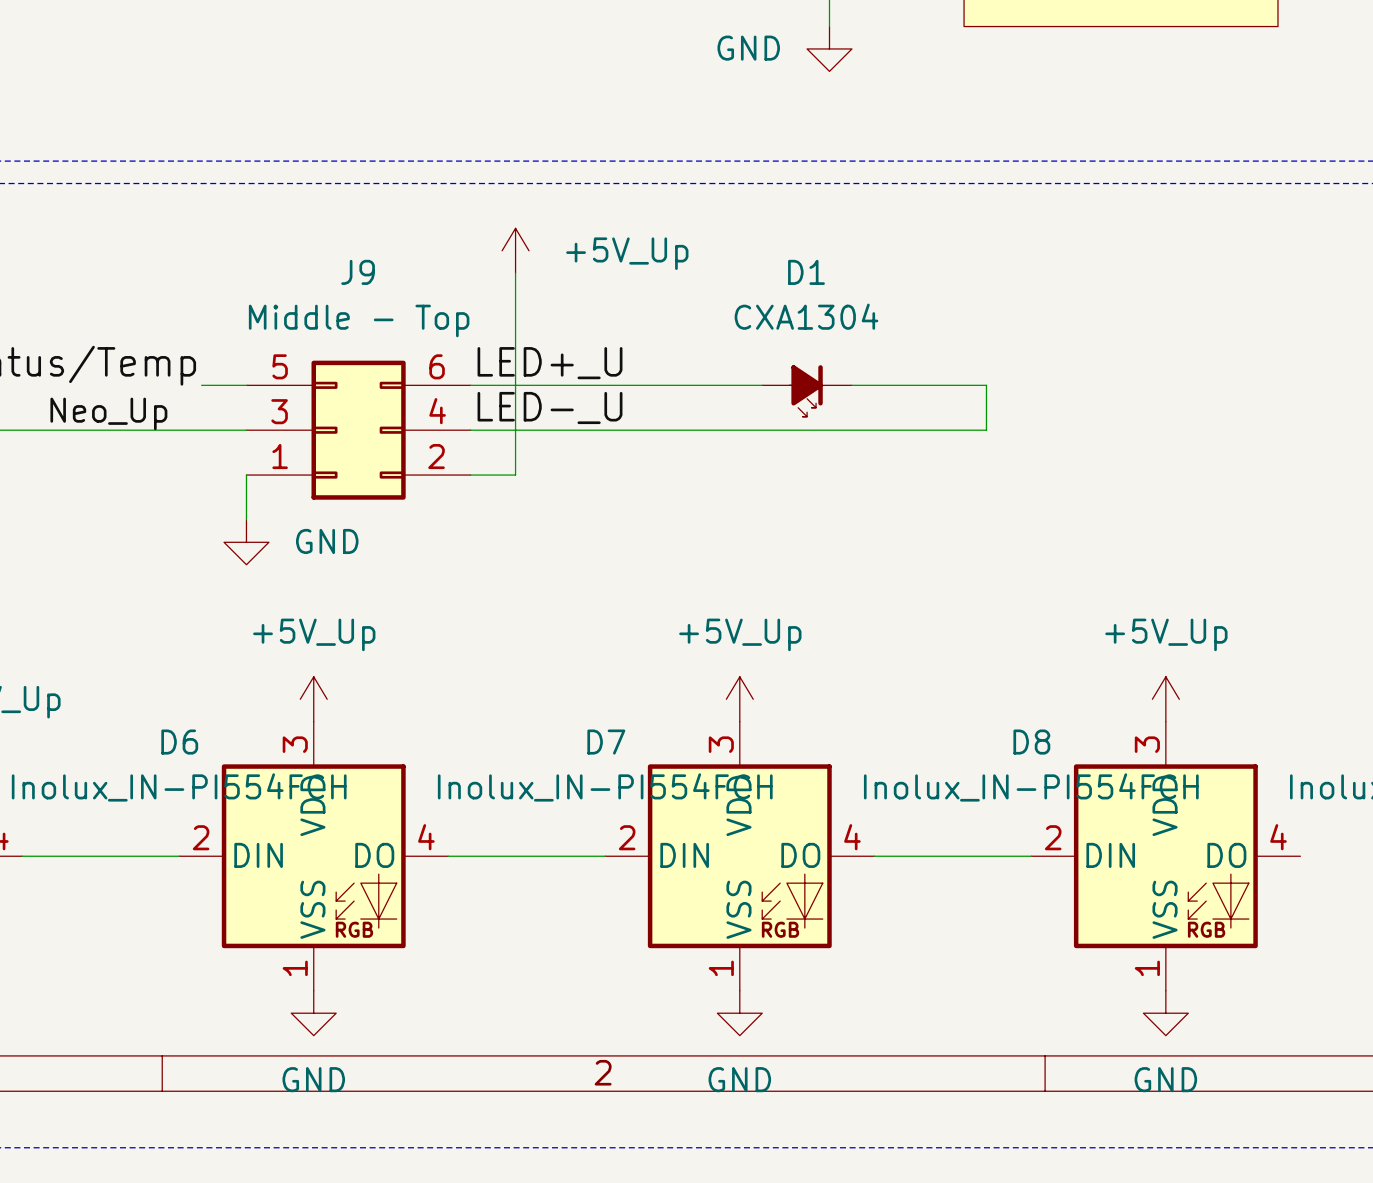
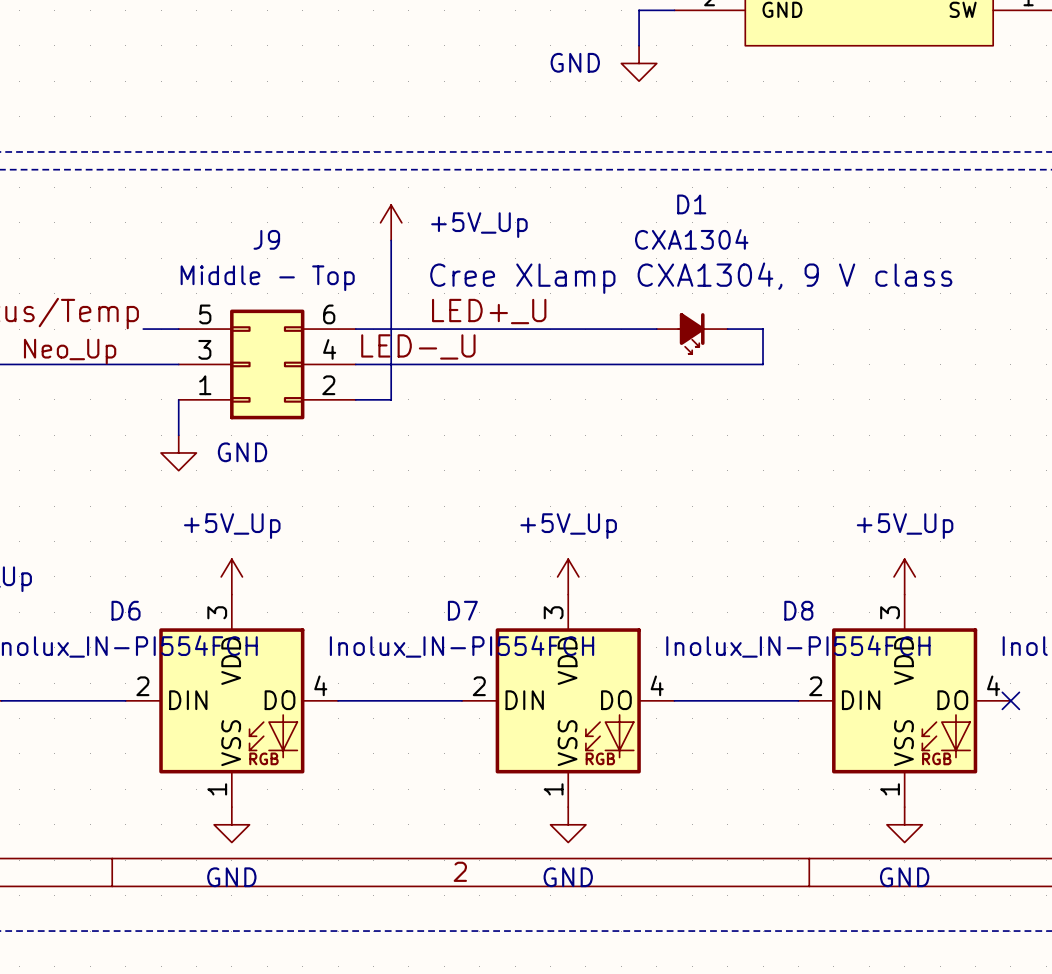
D1 name position: D1 (806, 272) -> D1 (691, 204)
D1 value position: CXA1304 (806, 316) -> CXA1304 (691, 239)
D1 text: none -> Cree XLamp CXA1304, 9 V class (691, 278)
label position: LED+_U (550, 363) -> LED+_U (489, 311)
D1 position: (807, 390) -> (692, 333)
no-connect mark: none -> (1010, 700)

